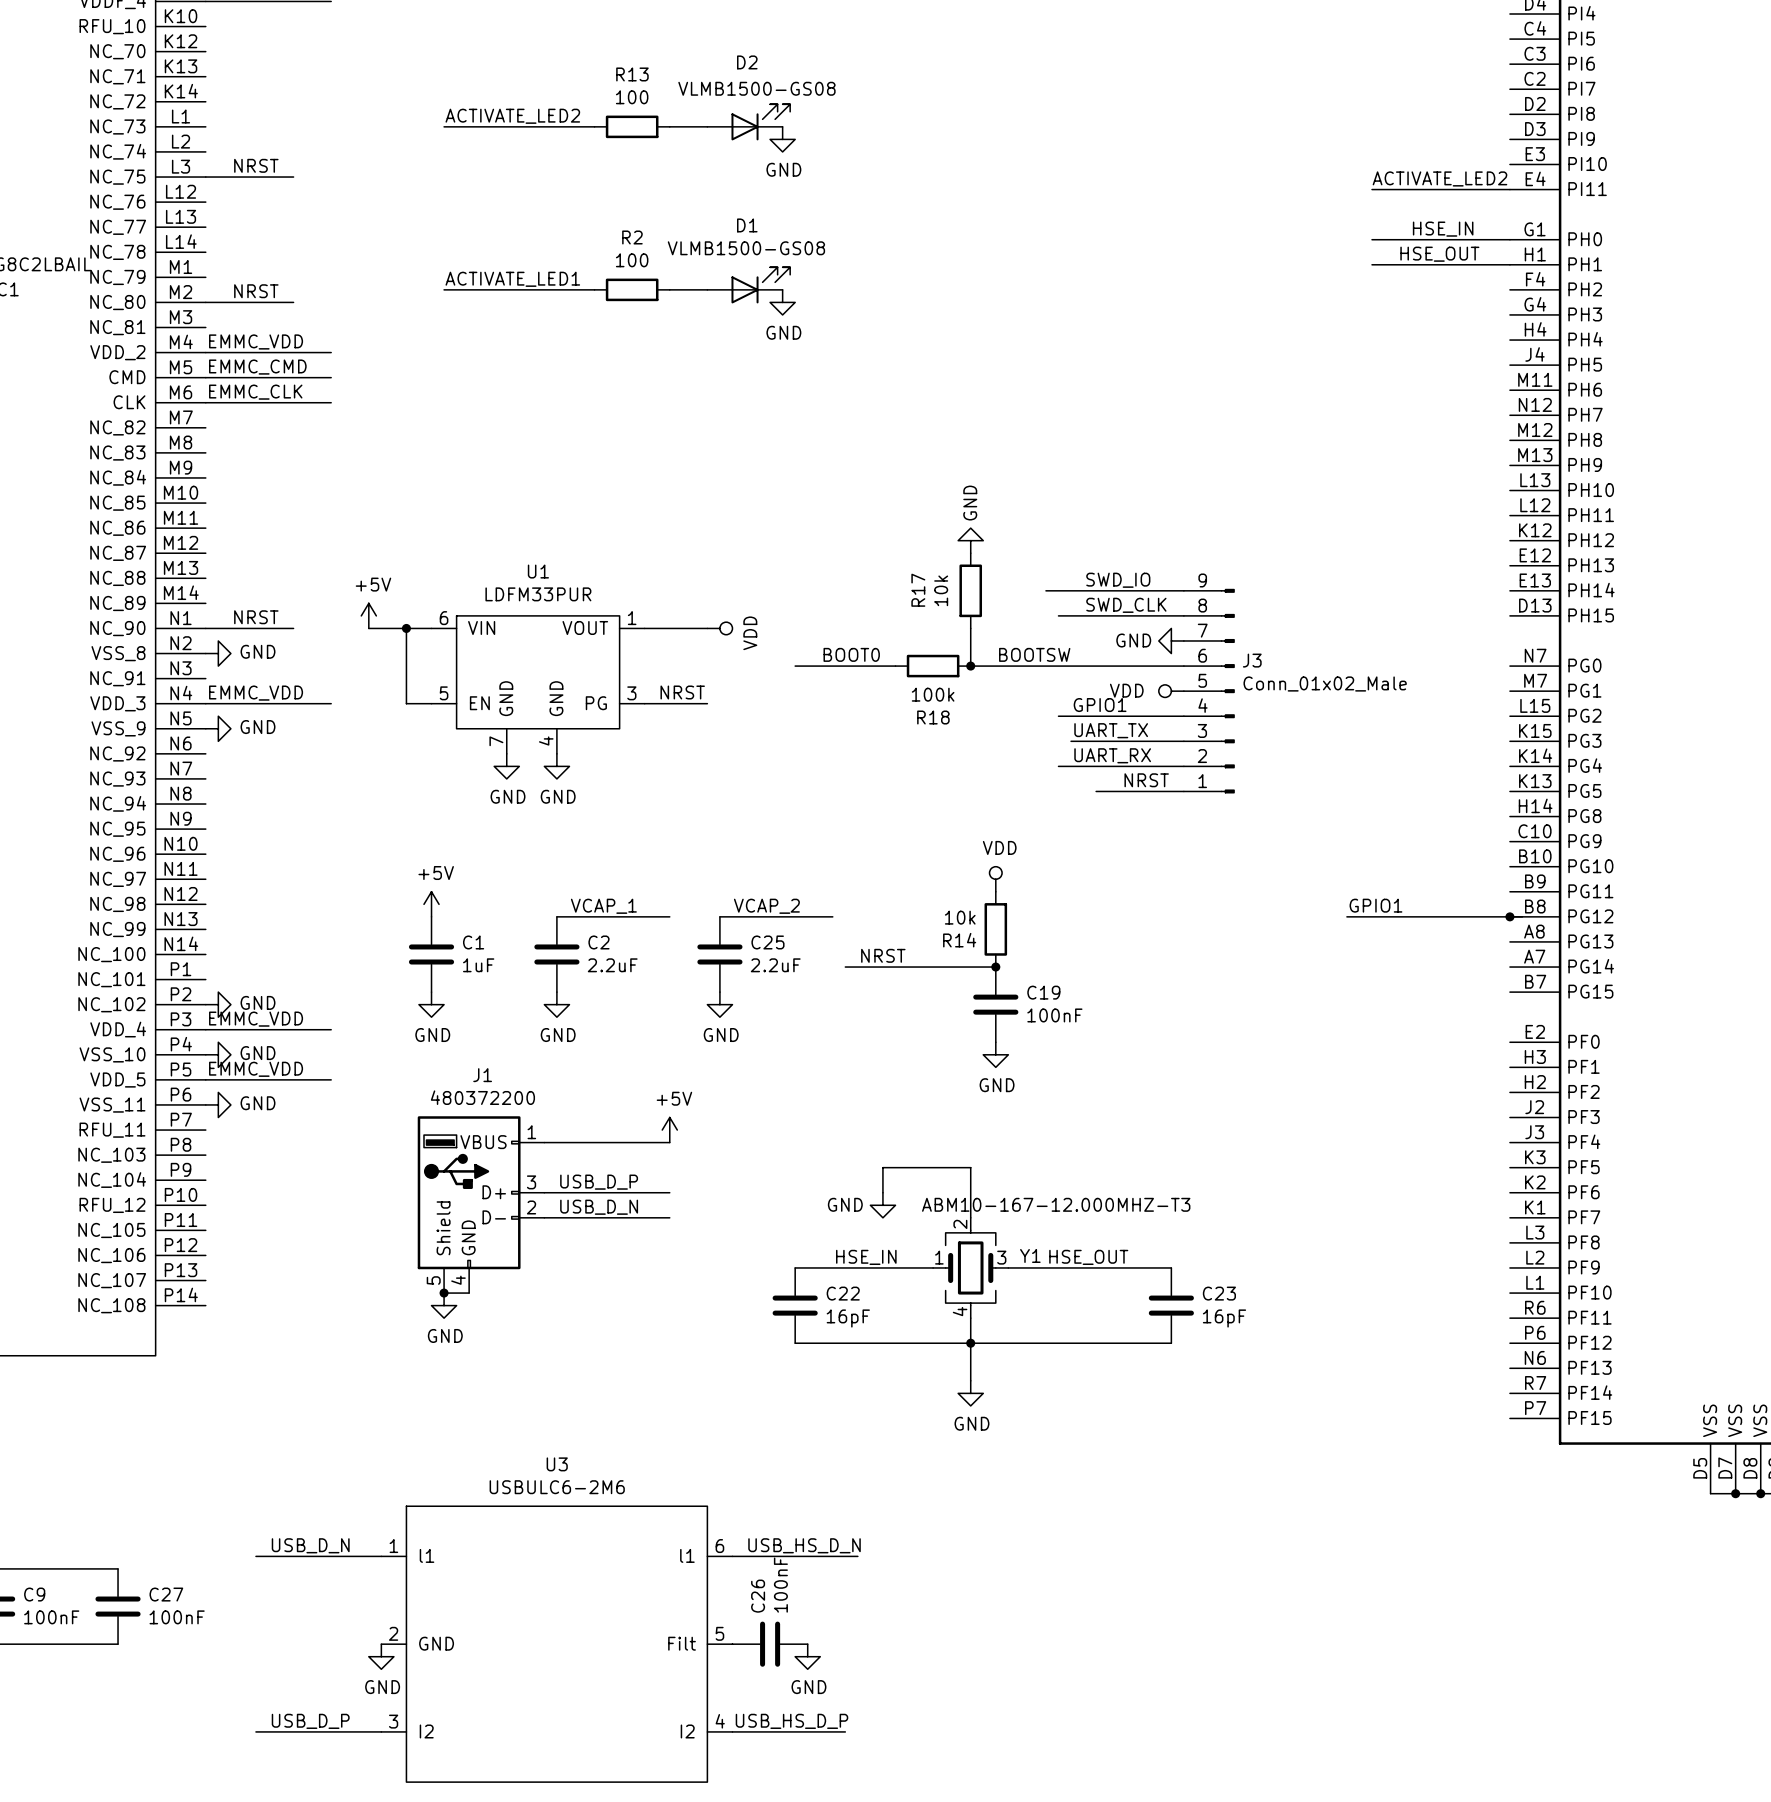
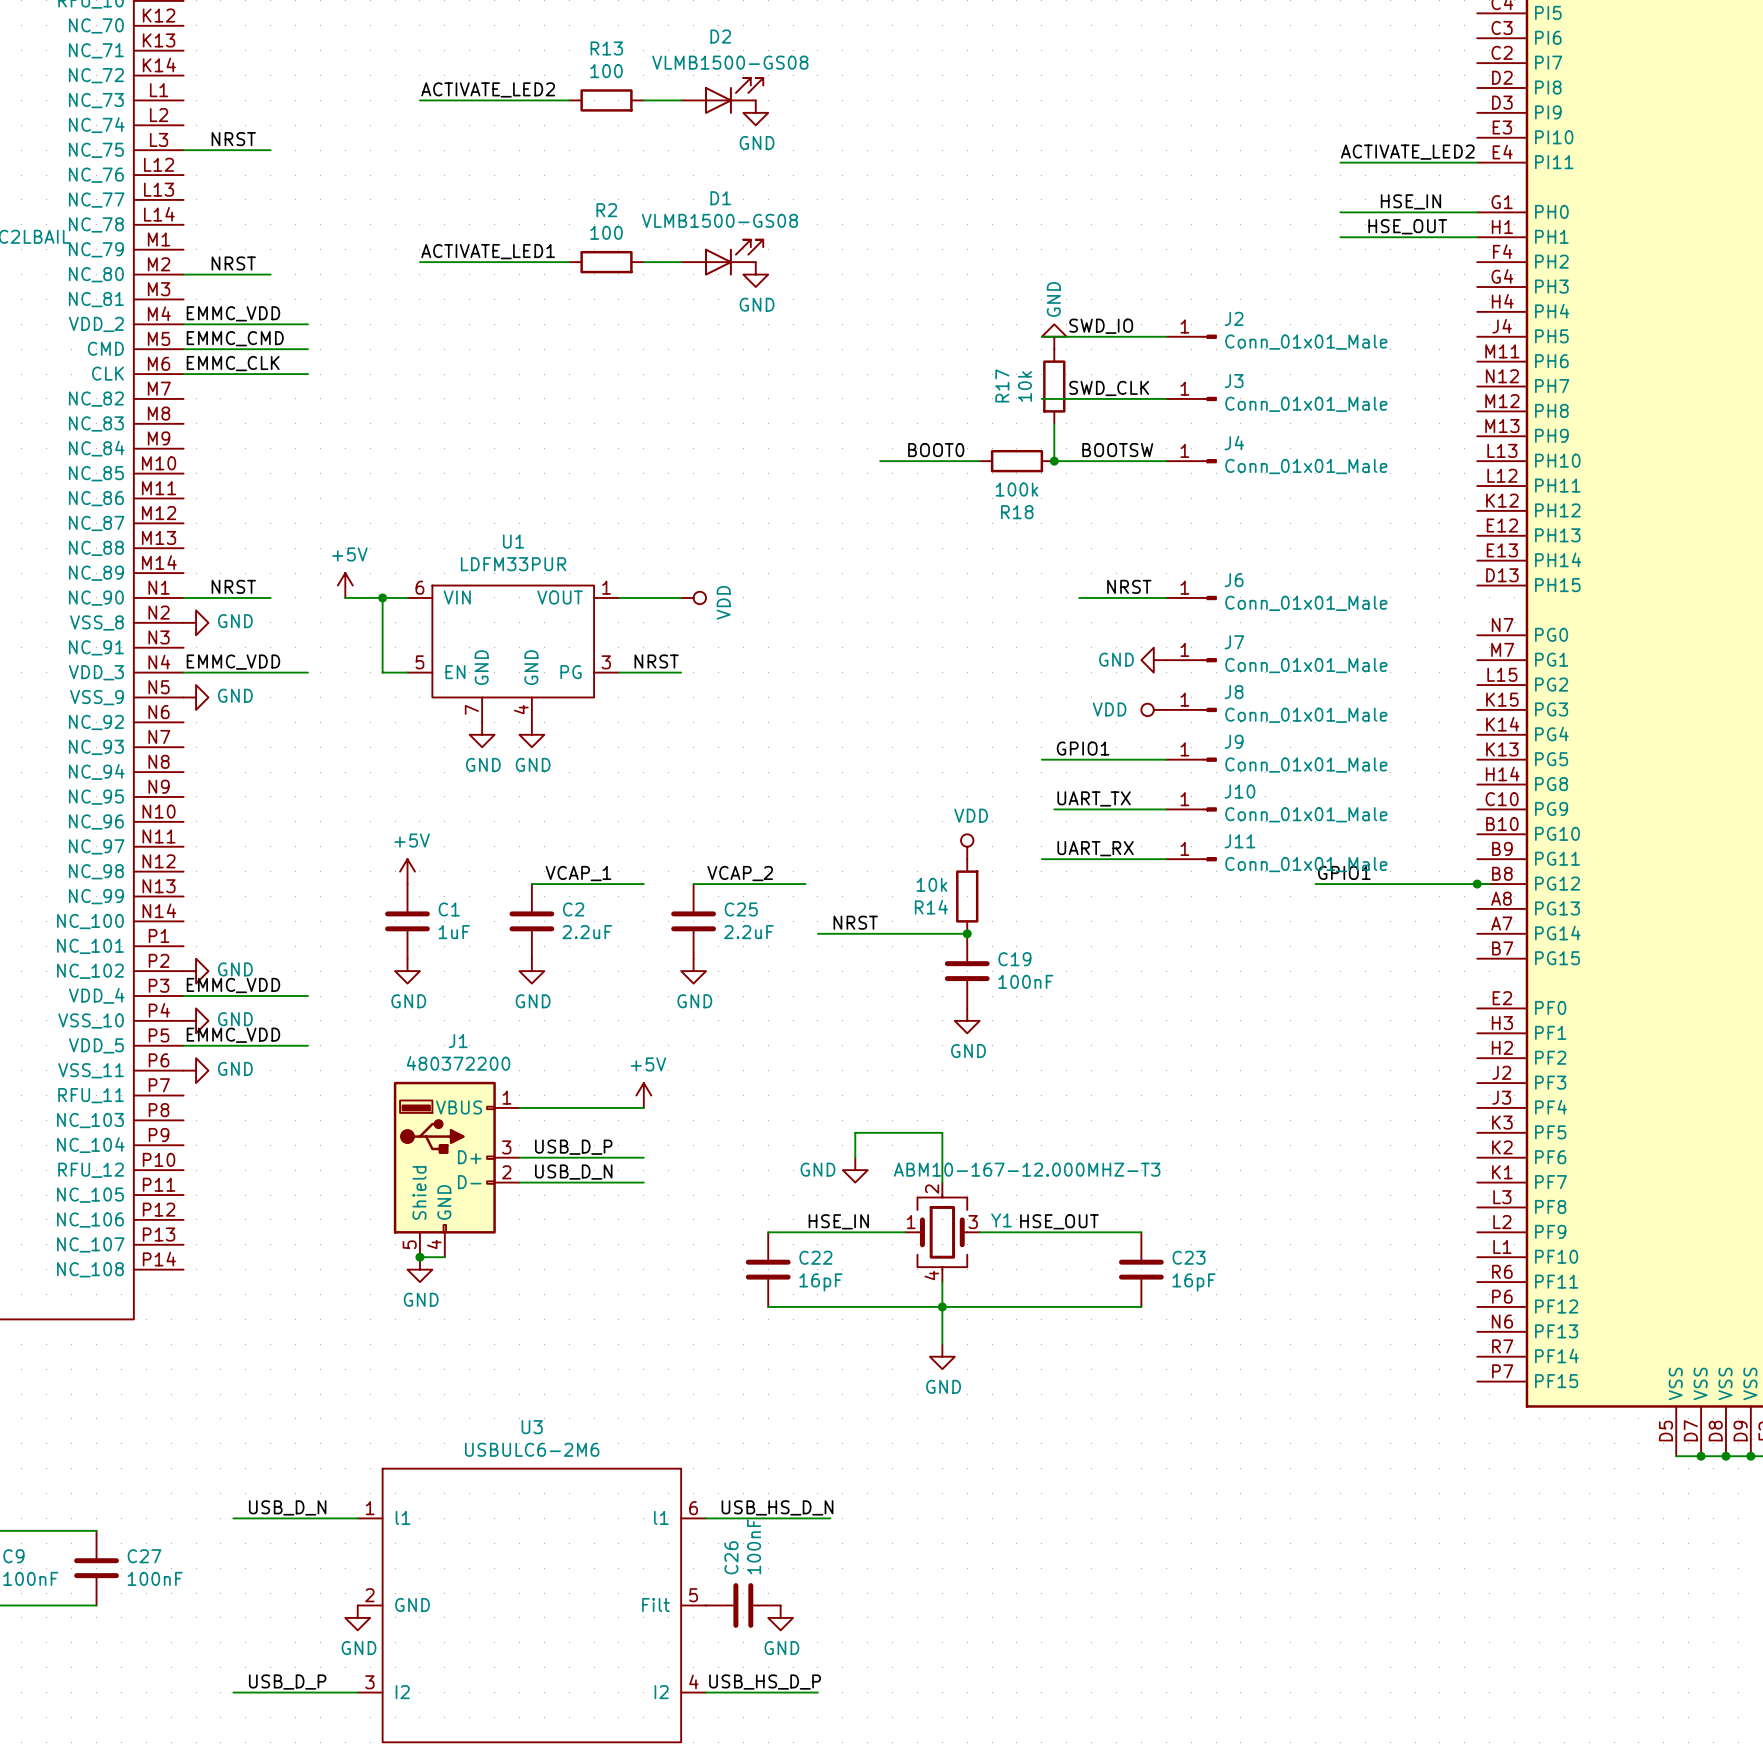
wire: none -> (1041, 336) (1166, 336)
power symbol: none -> GND (1054, 336)
J2: none -> Conn_01x01_Male (1191, 336)
wire: none -> (1054, 423) (1054, 461) (1166, 461)
junction: none -> (1054, 461)
J4: none -> Conn_01x01_Male (1191, 461)
power symbol: GND (970, 540) -> none
label position: SWD_IO (1118, 580) -> SWD_IO (1101, 326)
J3 symbol: [1183, 588, 1235, 794] -> [1166, 396, 1217, 401]
R17 position: (970, 590) -> (1054, 386)
wire: (1045, 590) (1183, 590) -> none
label position: SWD_CLK (1126, 605) -> SWD_CLK (1109, 388)
wire: (1058, 615) (1183, 615) -> (1041, 398) (1166, 398)
wire: (970, 628) (970, 666) (1183, 666) -> none
wire: none -> (1079, 597) (1166, 597)
J6: none -> Conn_01x01_Male (1191, 597)
power symbol position: GND (1171, 640) -> GND (1153, 660)
label position: BOOT0 (851, 654) -> BOOT0 (936, 450)
label position: BOOTSW (1034, 654) -> BOOTSW (1117, 450)
wire: (795, 666) (895, 666) -> (880, 461) (979, 461)
R18 position: (933, 666) -> (1016, 461)
junction: (970, 666) -> none
J3 value: Conn_01x02_Male (1325, 684) -> Conn_01x01_Male (1306, 404)
power symbol position: VDD (1171, 691) -> VDD (1153, 709)
J7: none -> Conn_01x01_Male (1191, 660)
label position: GPIO1 (1100, 705) -> GPIO1 (1083, 748)
wire: (1058, 716) (1183, 716) -> none
label position: UART_TX (1111, 730) -> UART_TX (1094, 798)
wire: (1071, 741) (1183, 741) -> (1054, 809) (1166, 809)
J8: none -> Conn_01x01_Male (1191, 709)
label position: UART_RX (1112, 755) -> UART_RX (1095, 848)
wire: (1058, 766) (1183, 766) -> (1041, 859) (1166, 859)
label position: NRST (1146, 780) -> NRST (1129, 586)
wire: none -> (1041, 759) (1066, 759)
J9: none -> Conn_01x01_Male (1191, 759)
J10: none -> Conn_01x01_Male (1191, 809)
J11: none -> Conn_01x01_Male (1191, 859)

